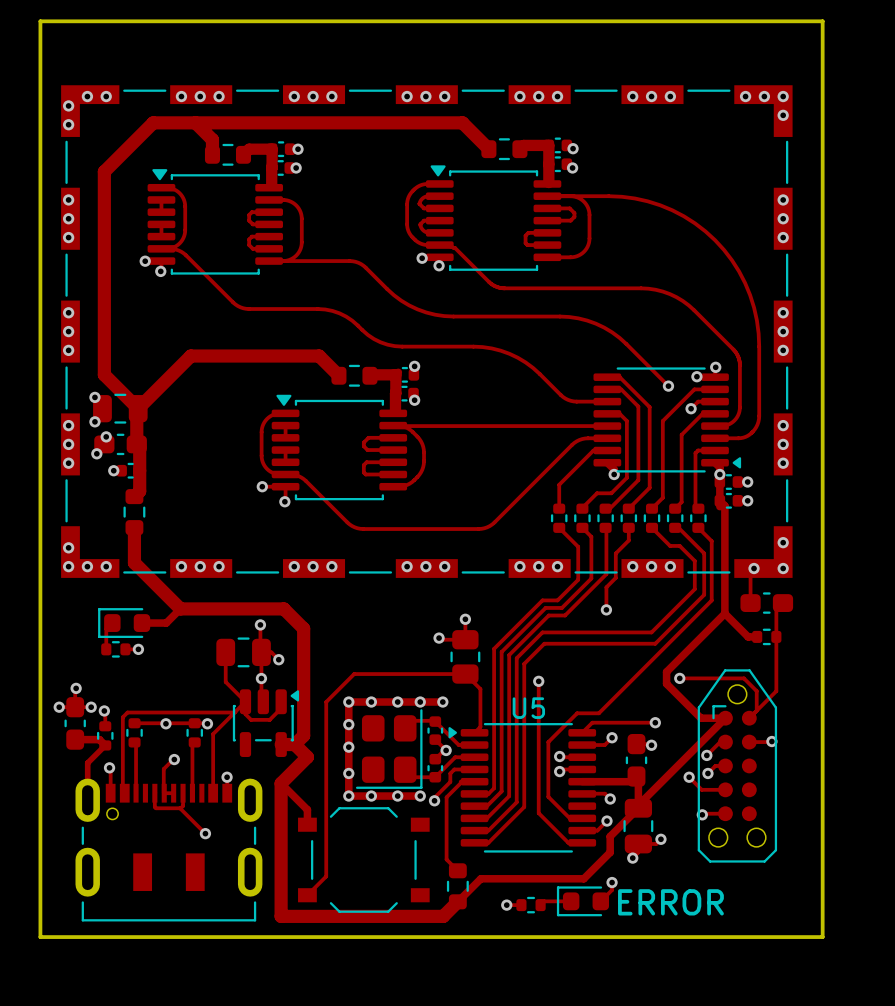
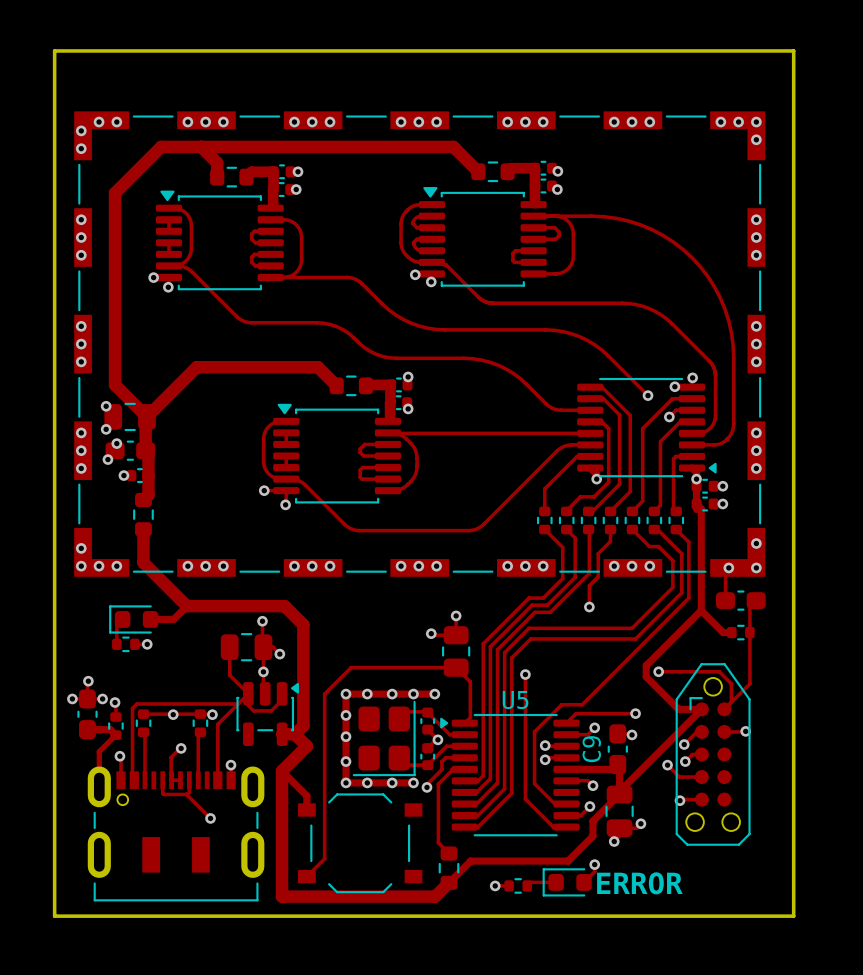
C9 name: none -> C9 (591, 749)

